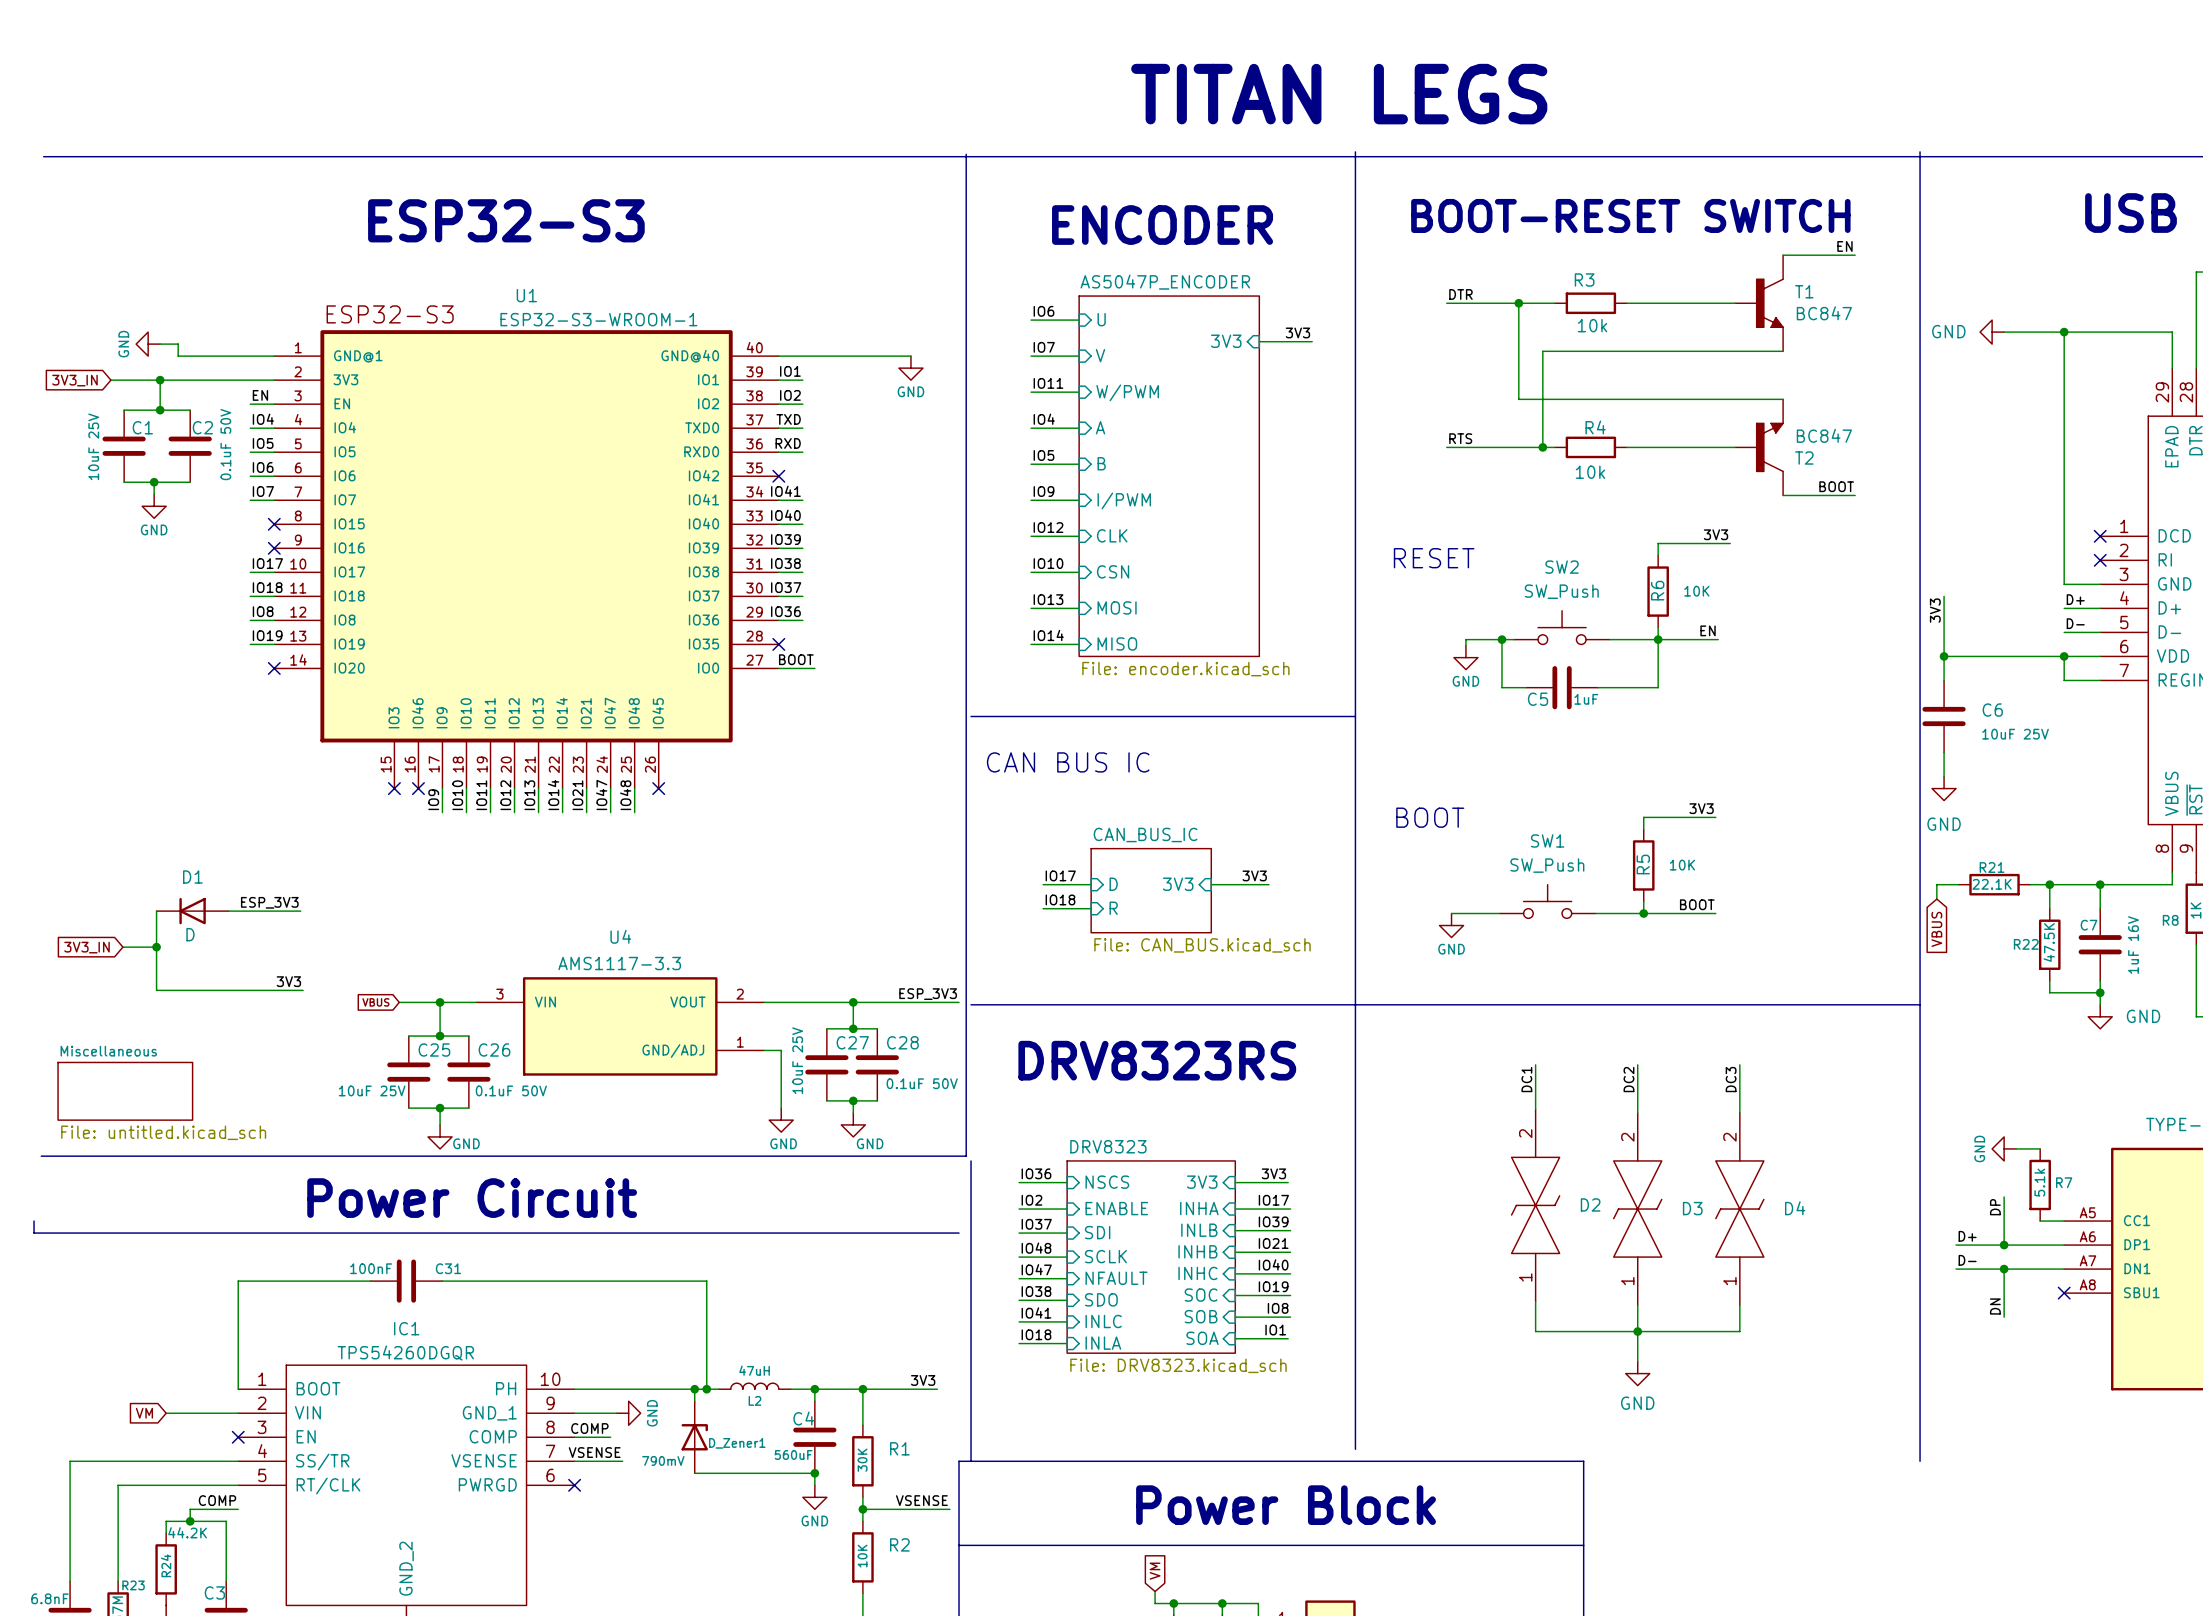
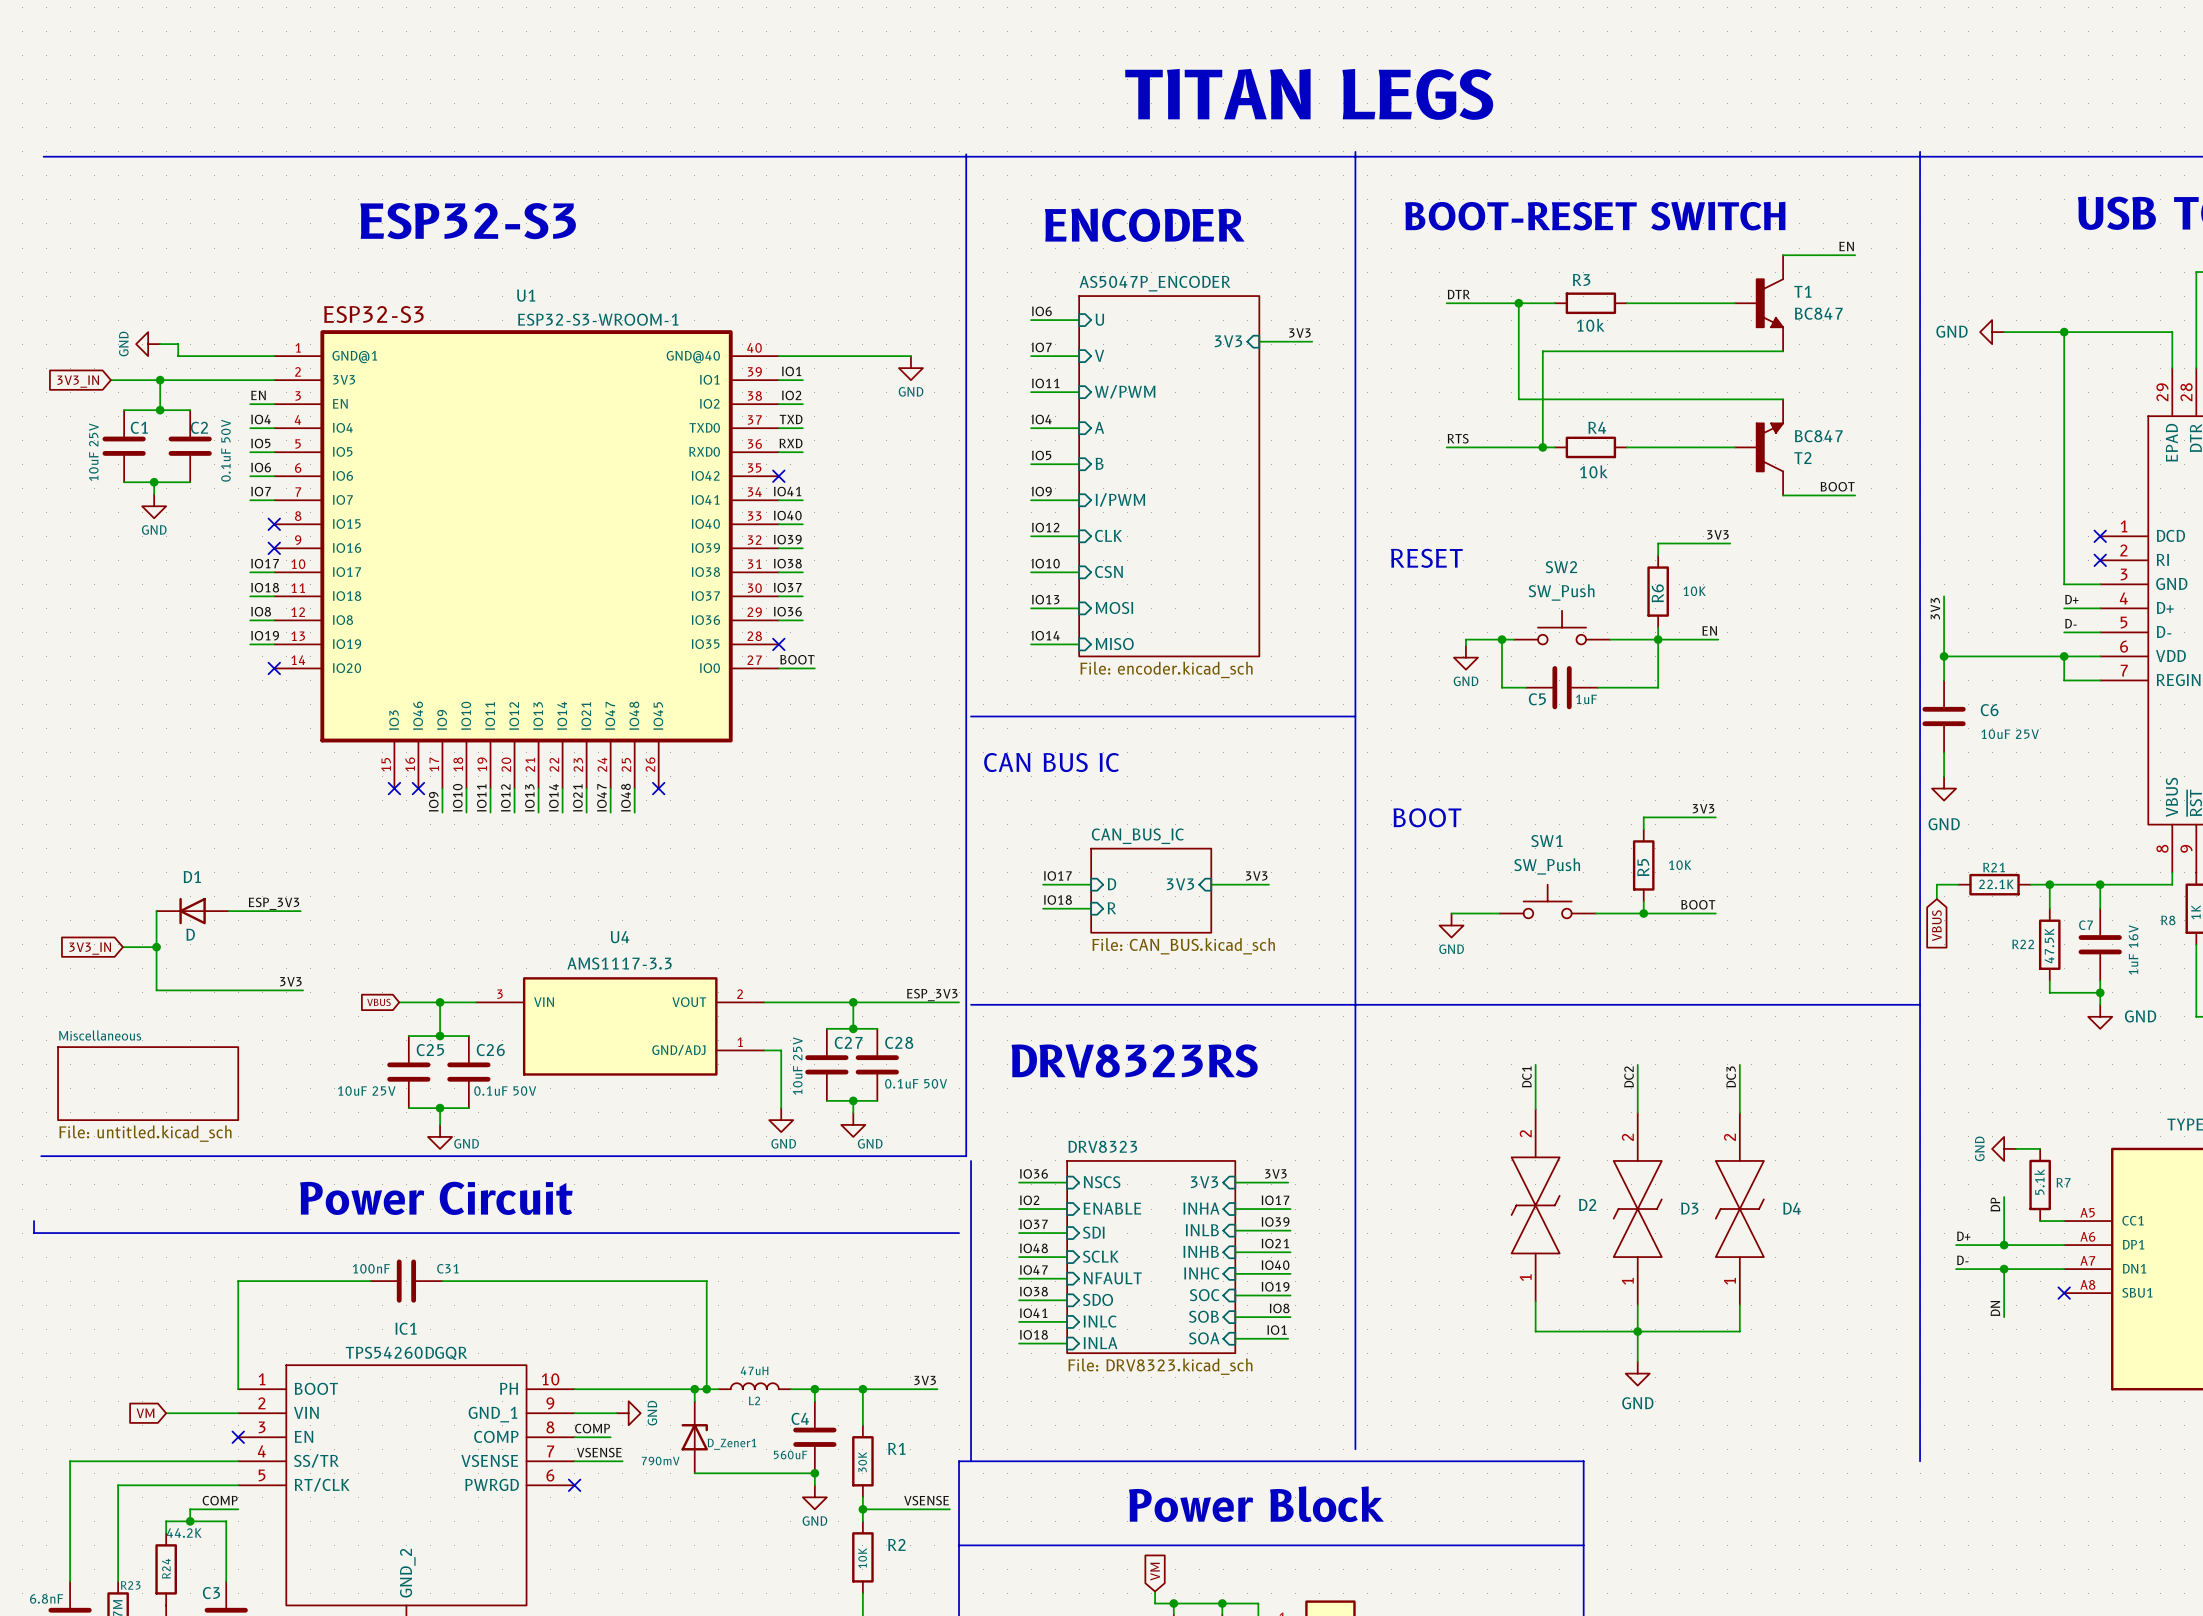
sheet Miscellaneous: none -> File: untitled.kicad_sch (148, 1083)
sheet Miscellaneous: File: untitled.kicad_sch (125, 1091) -> none

